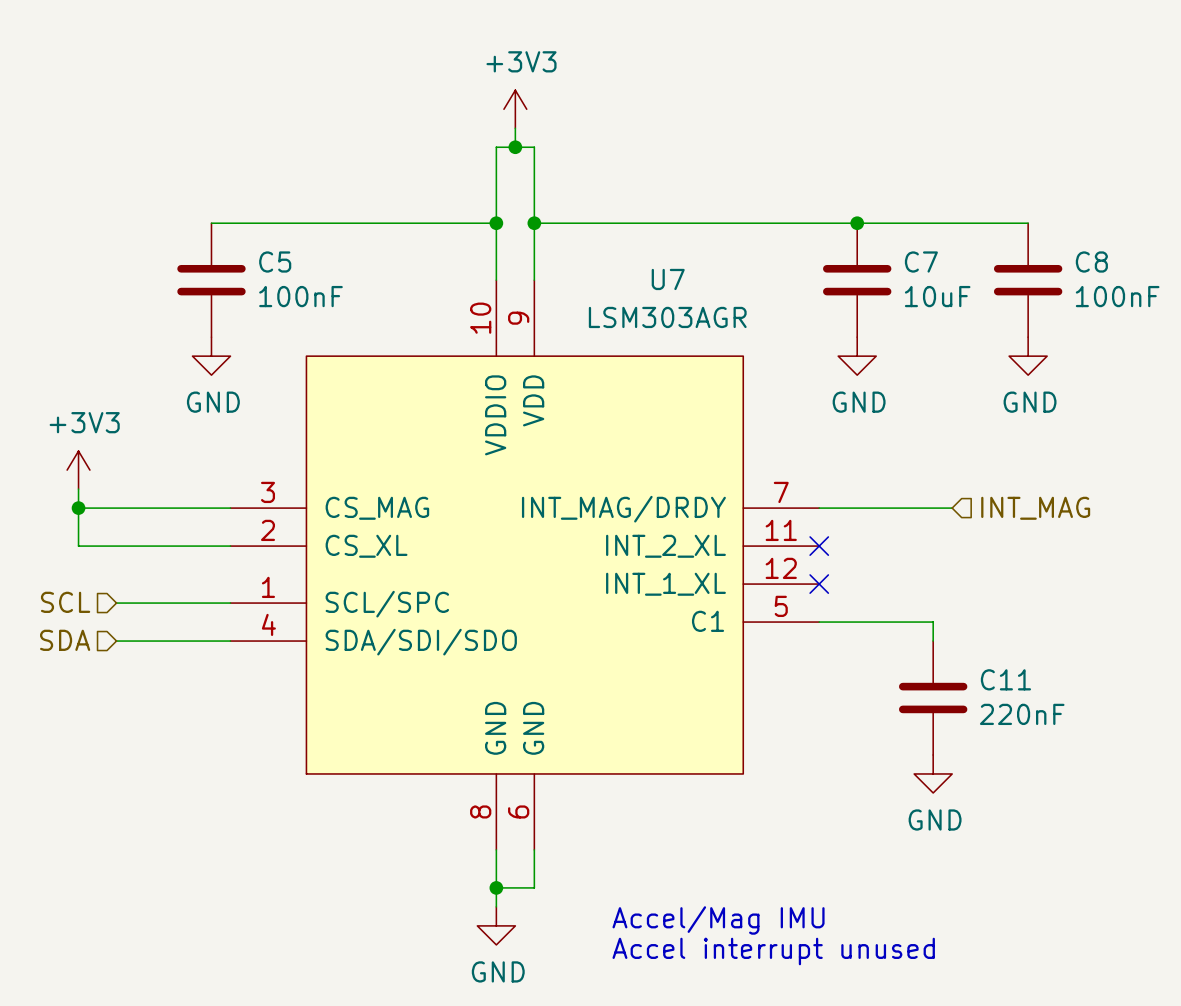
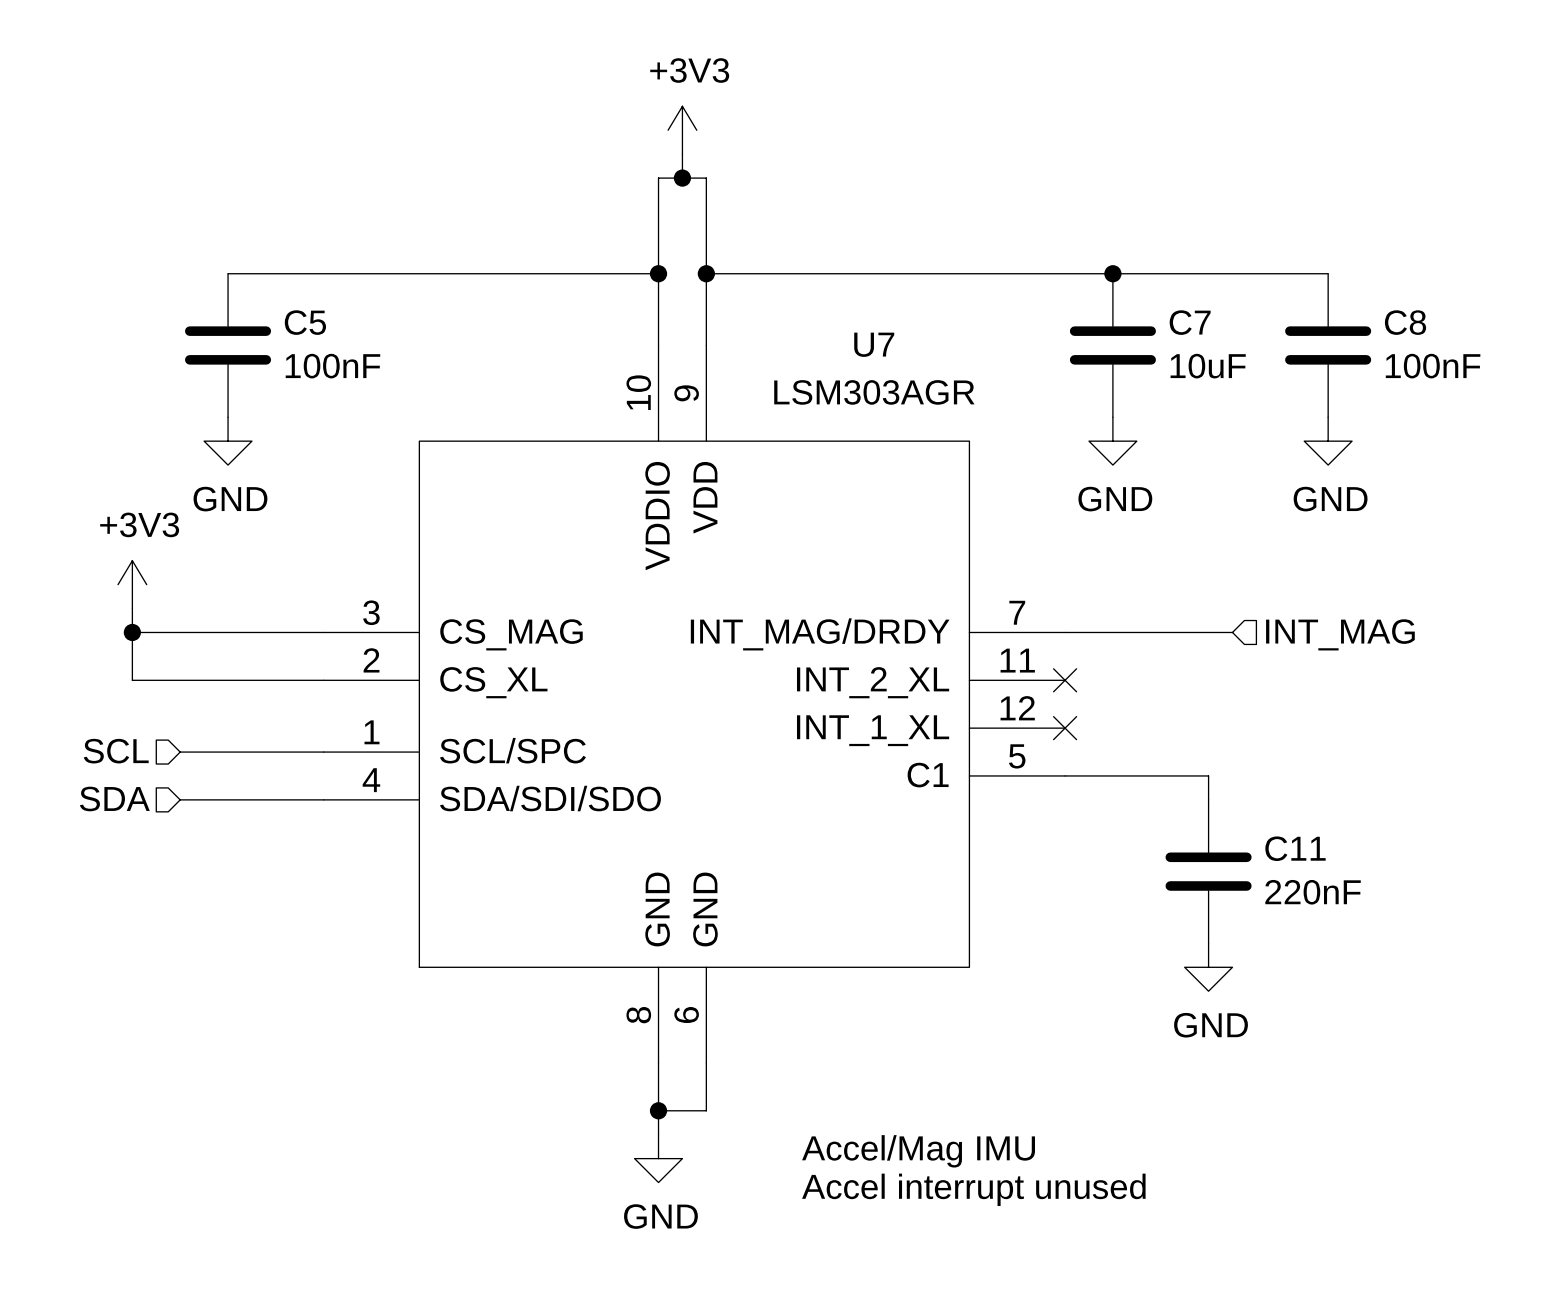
wire: none -> (228, 273) (299, 273)
C5 position: (211, 280) -> (228, 345)
power symbol position: GND (211, 356) -> GND (228, 441)

